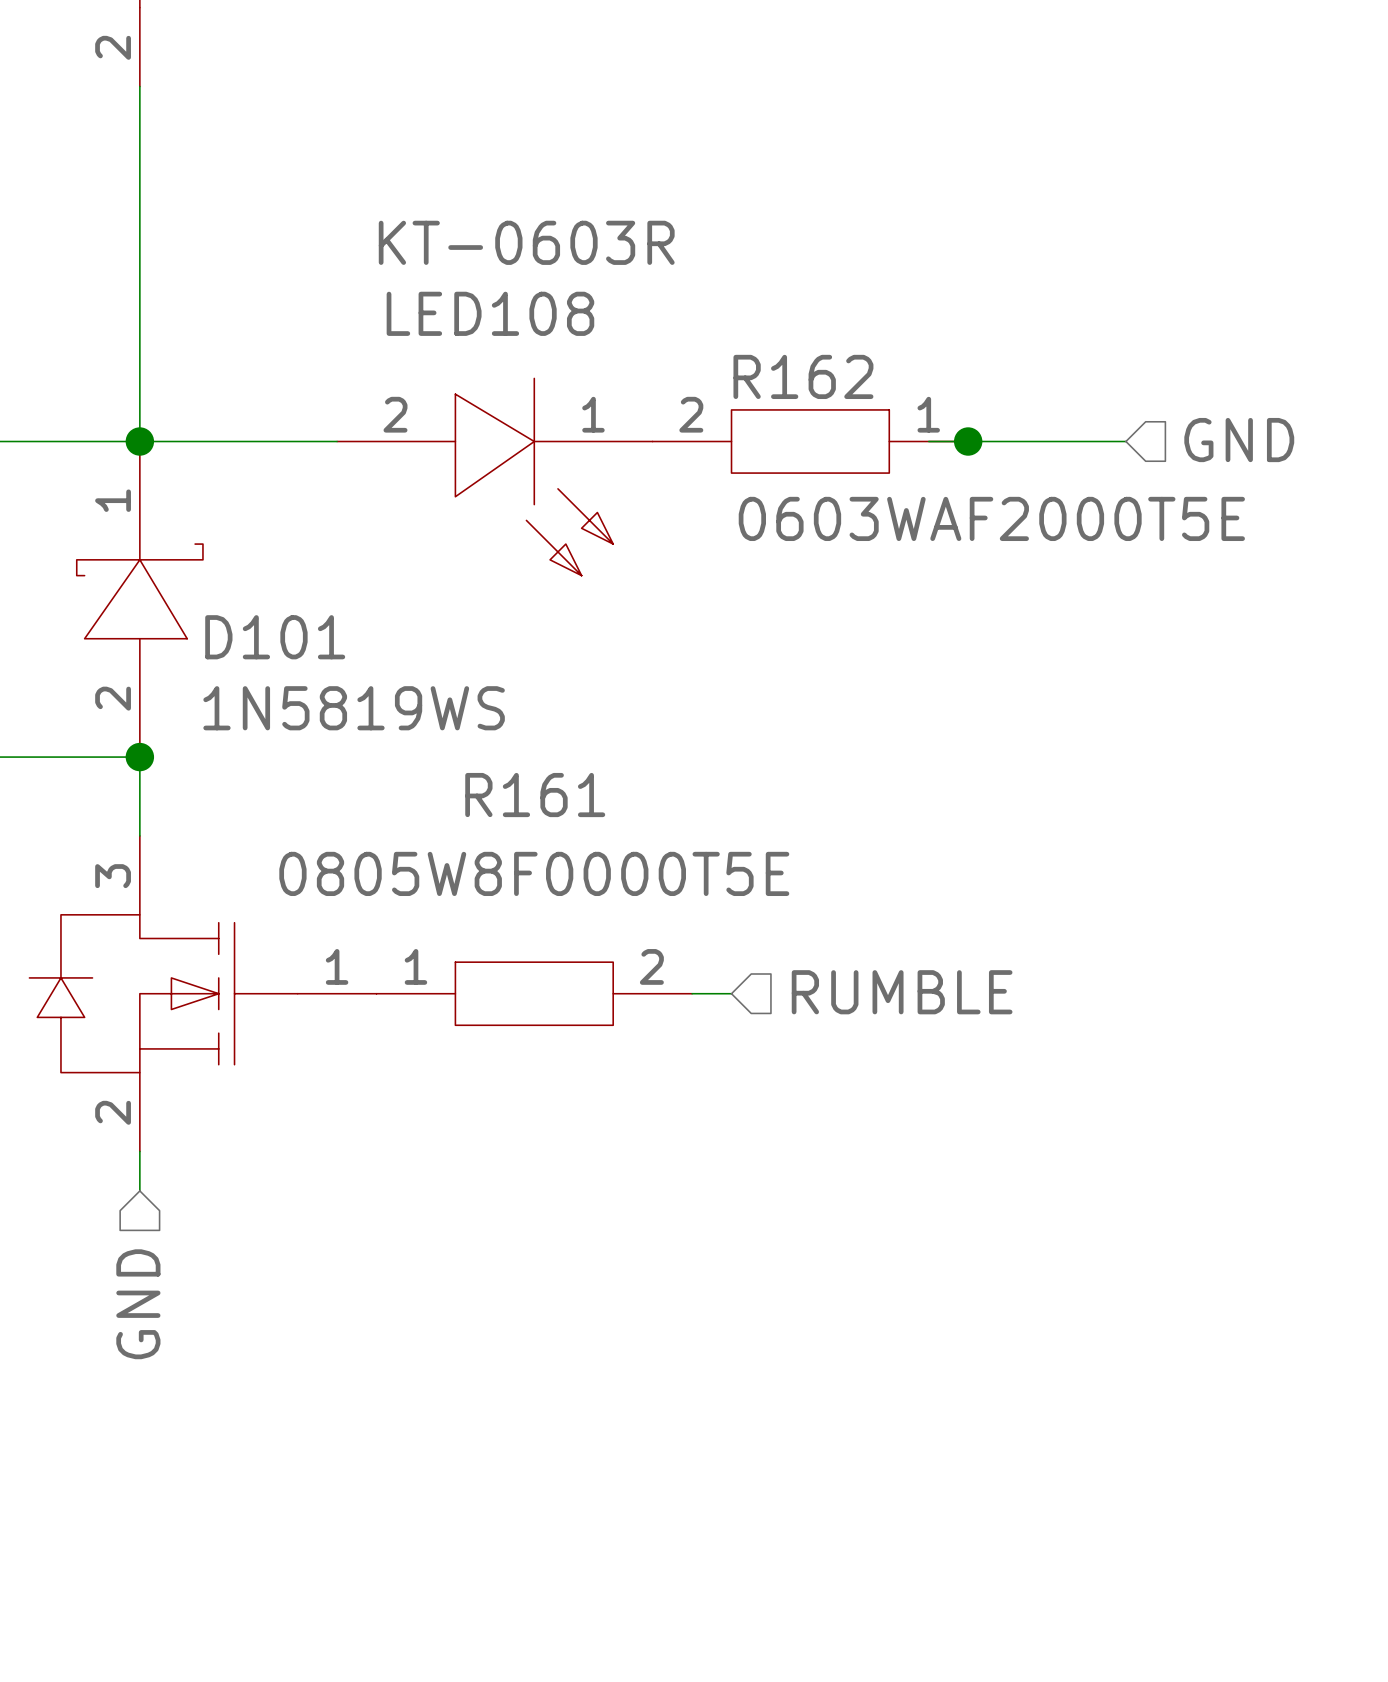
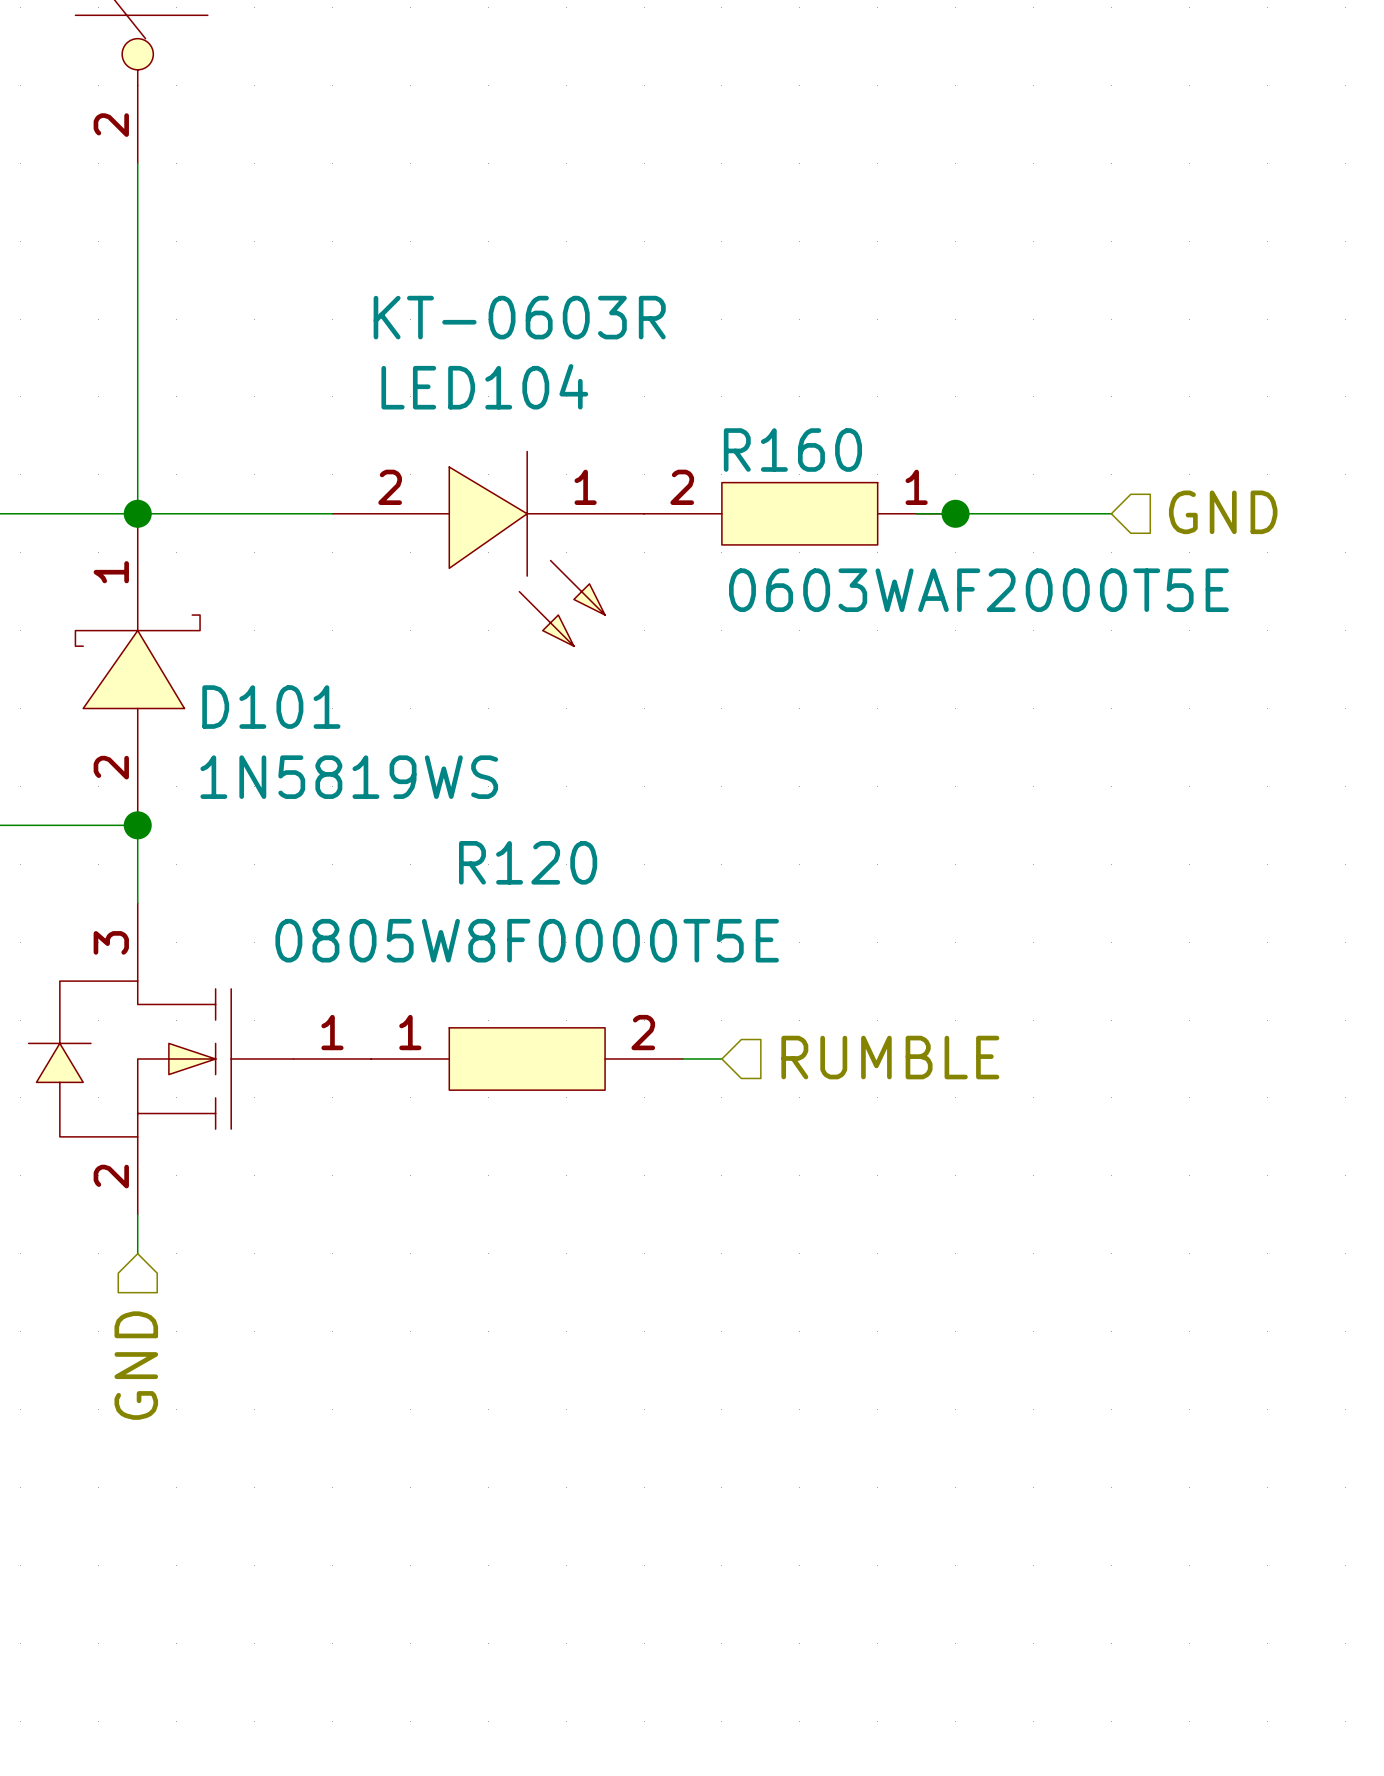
LED108 name: LED108 (490, 313) -> LED104 (484, 386)
R162 name: R162 (803, 376) -> R160 (792, 450)
R161 name: R161 (535, 795) -> R120 (528, 862)

